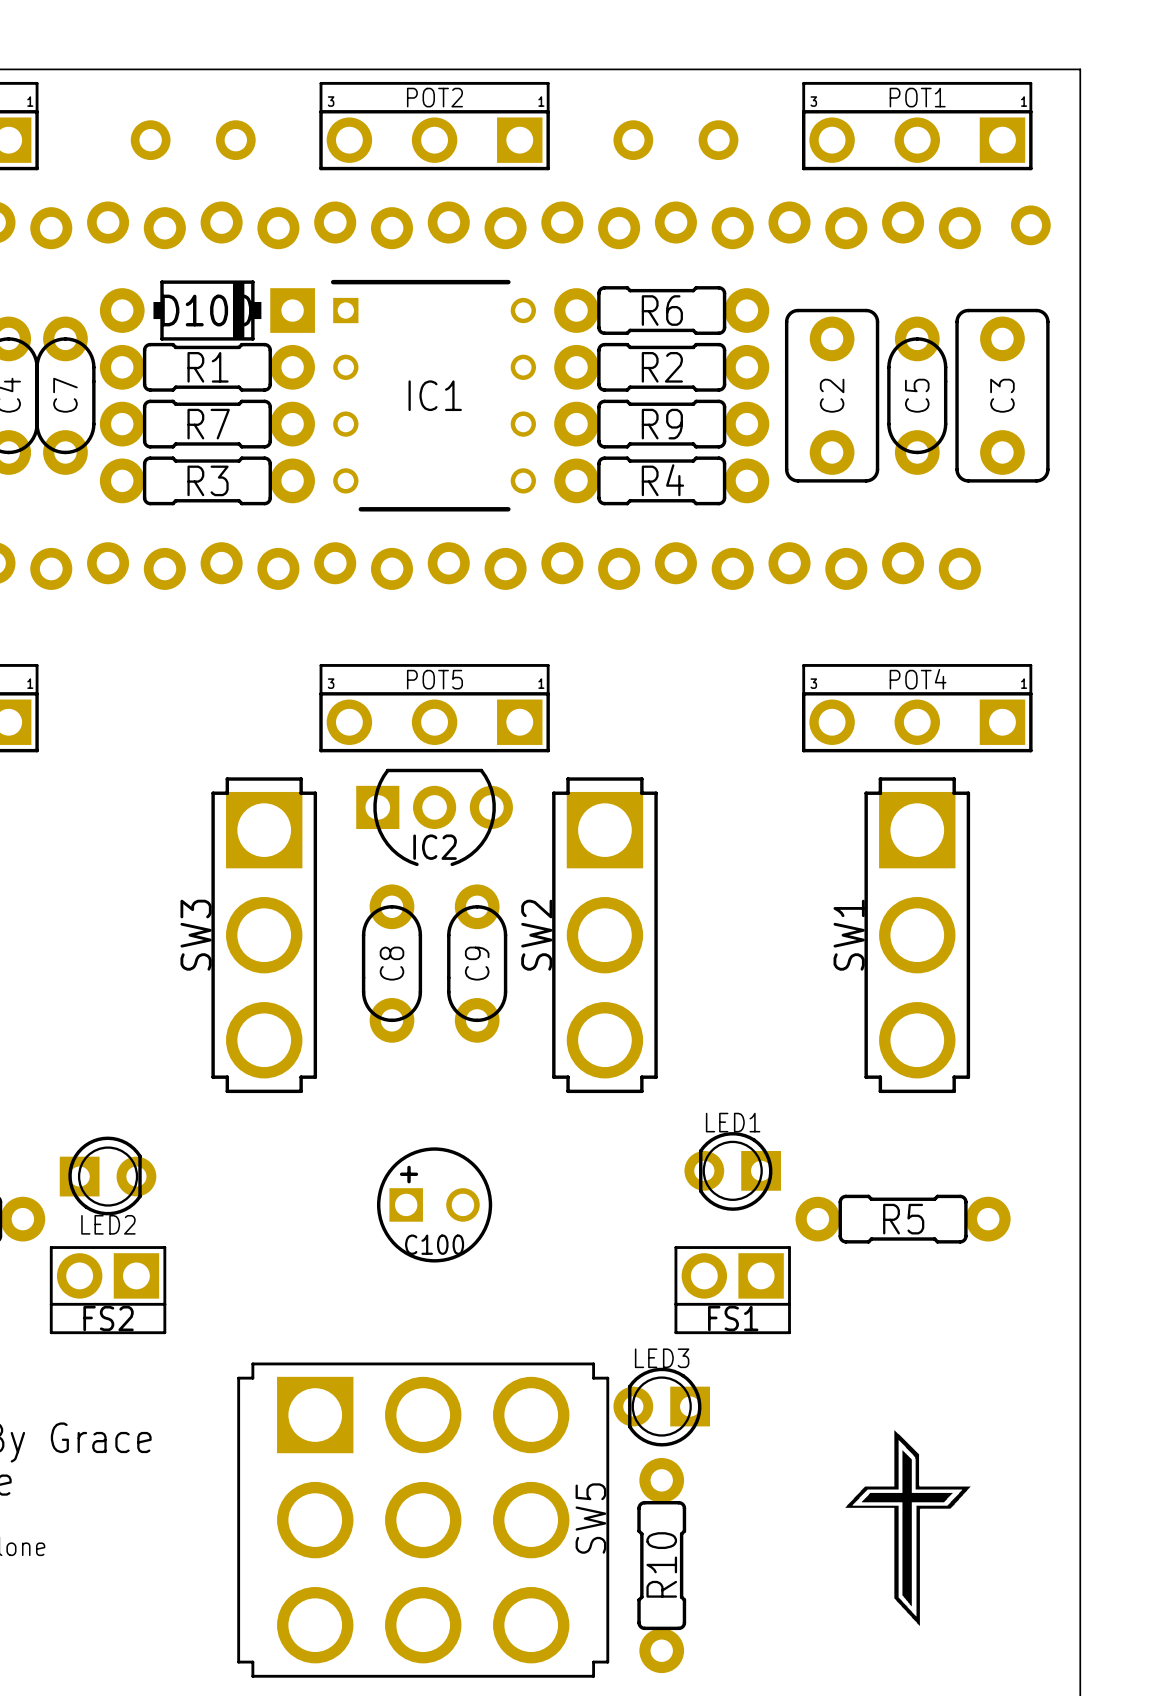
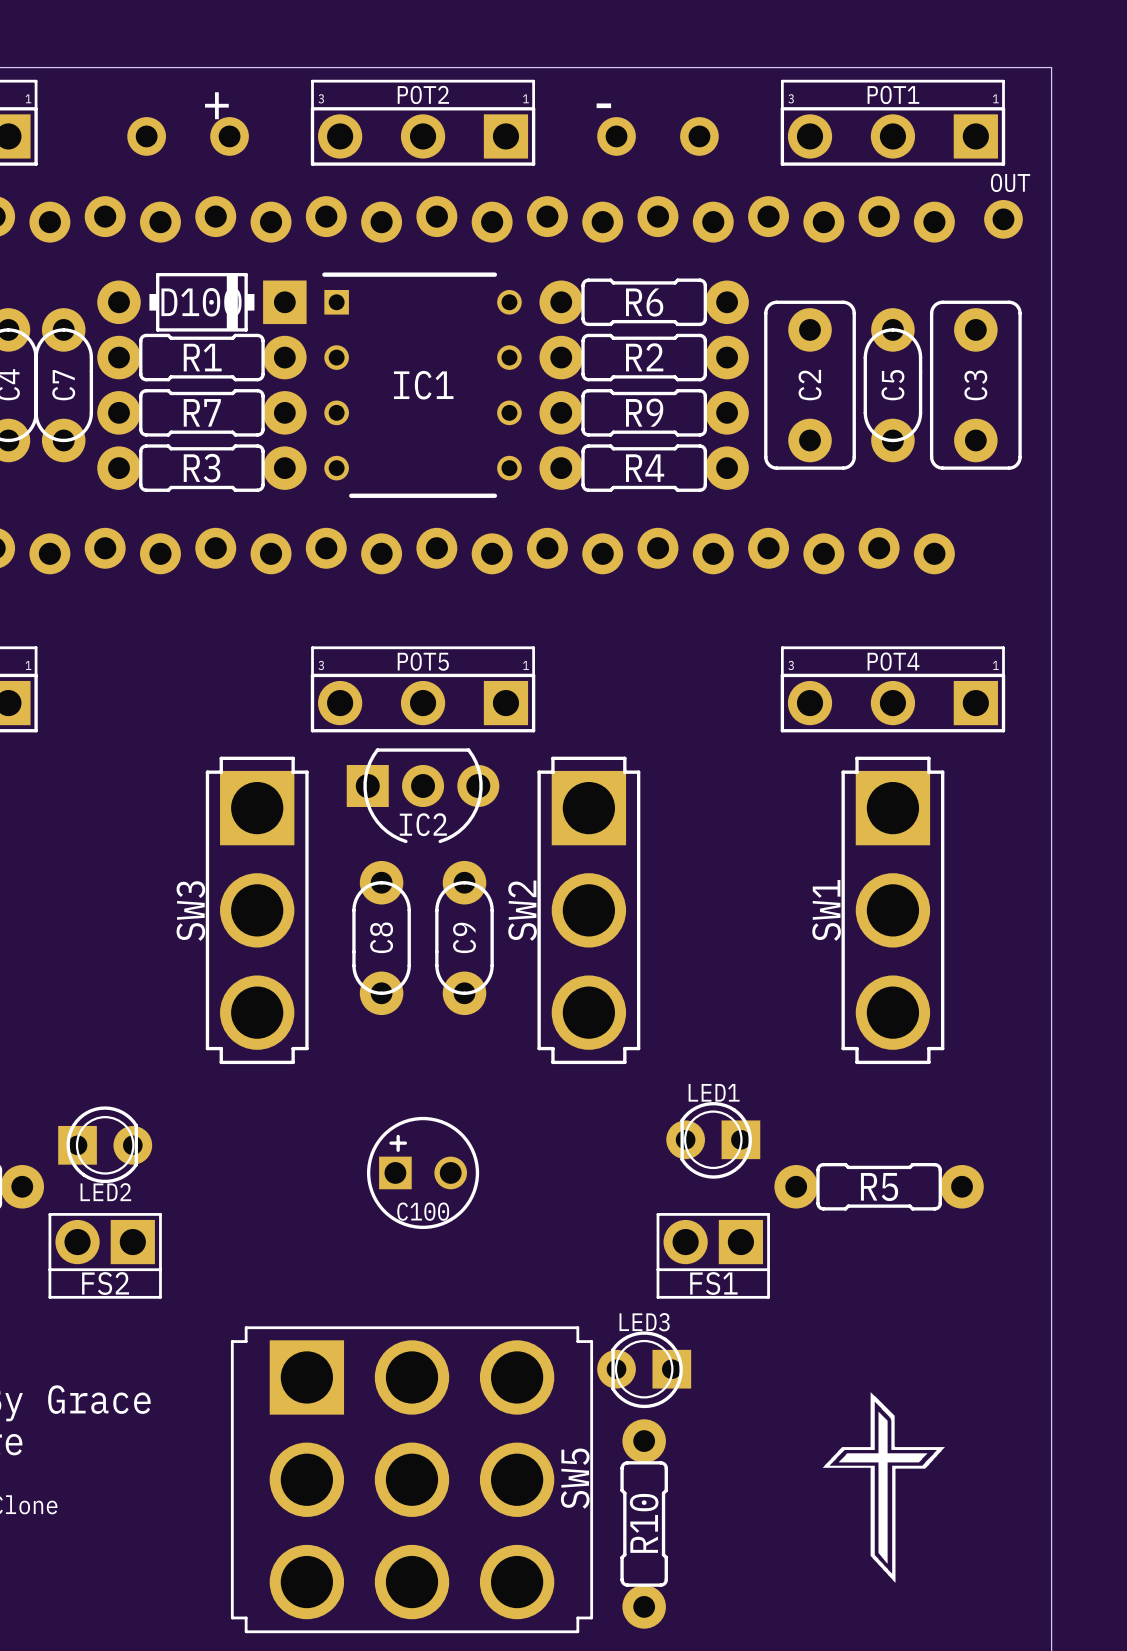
part text: none -> + (216, 105)
part text: none -> - (603, 105)
part text: none -> OUT (1010, 182)

